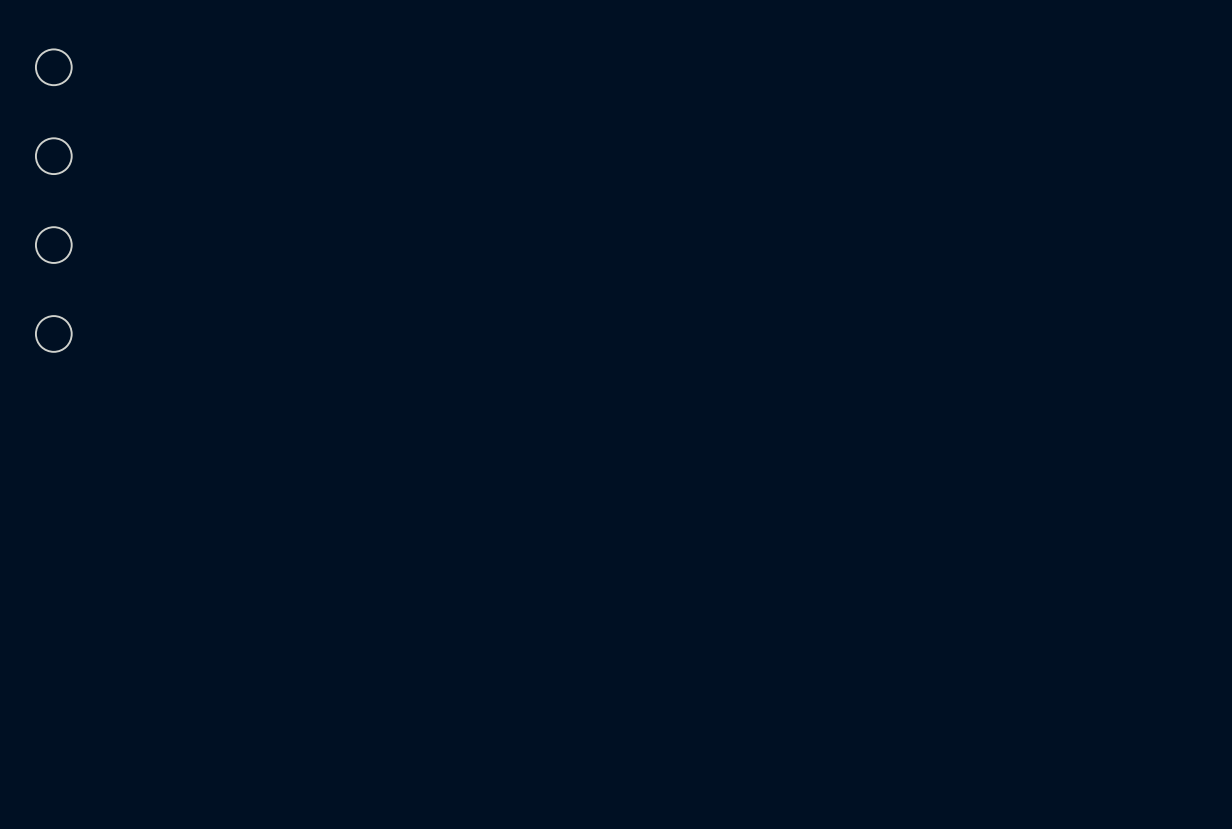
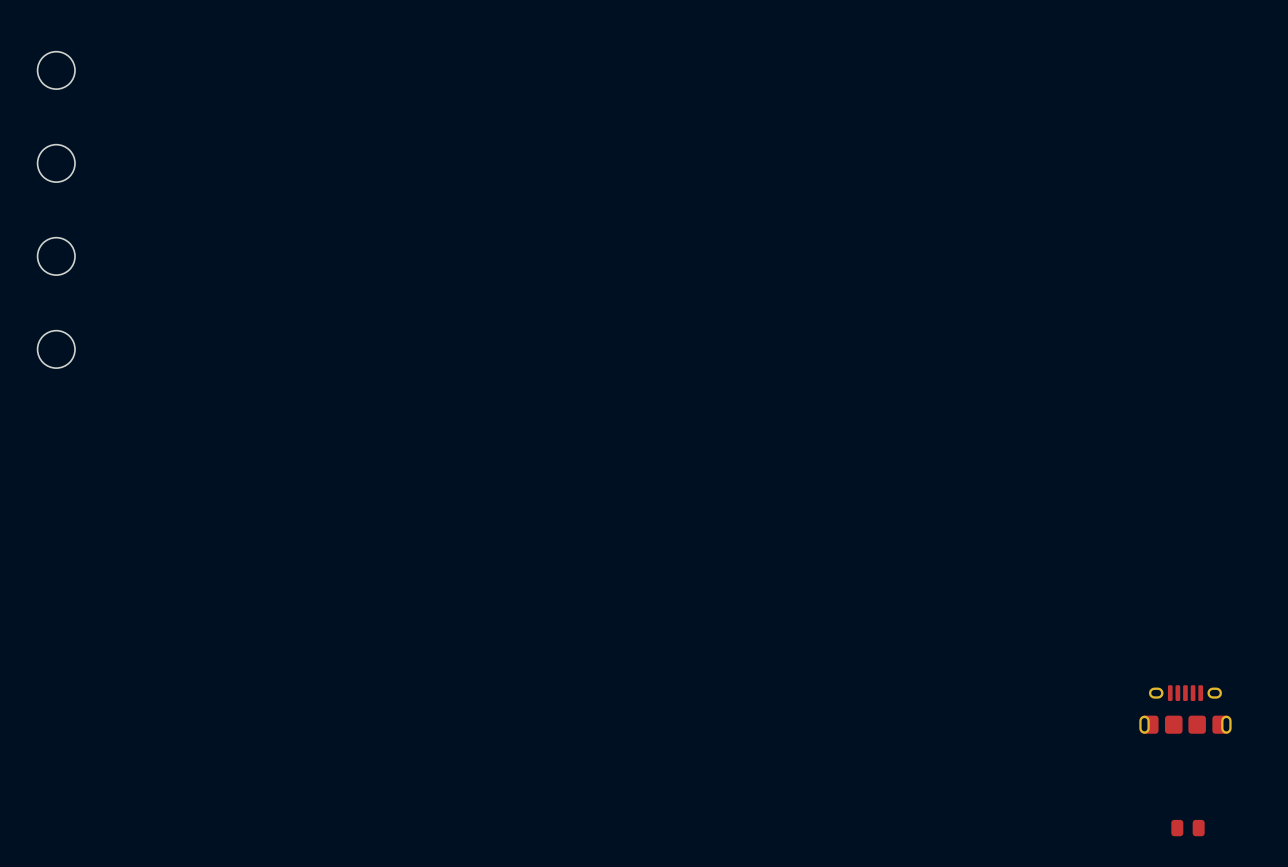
part: none -> (1185, 709)
part: none -> (1187, 828)

